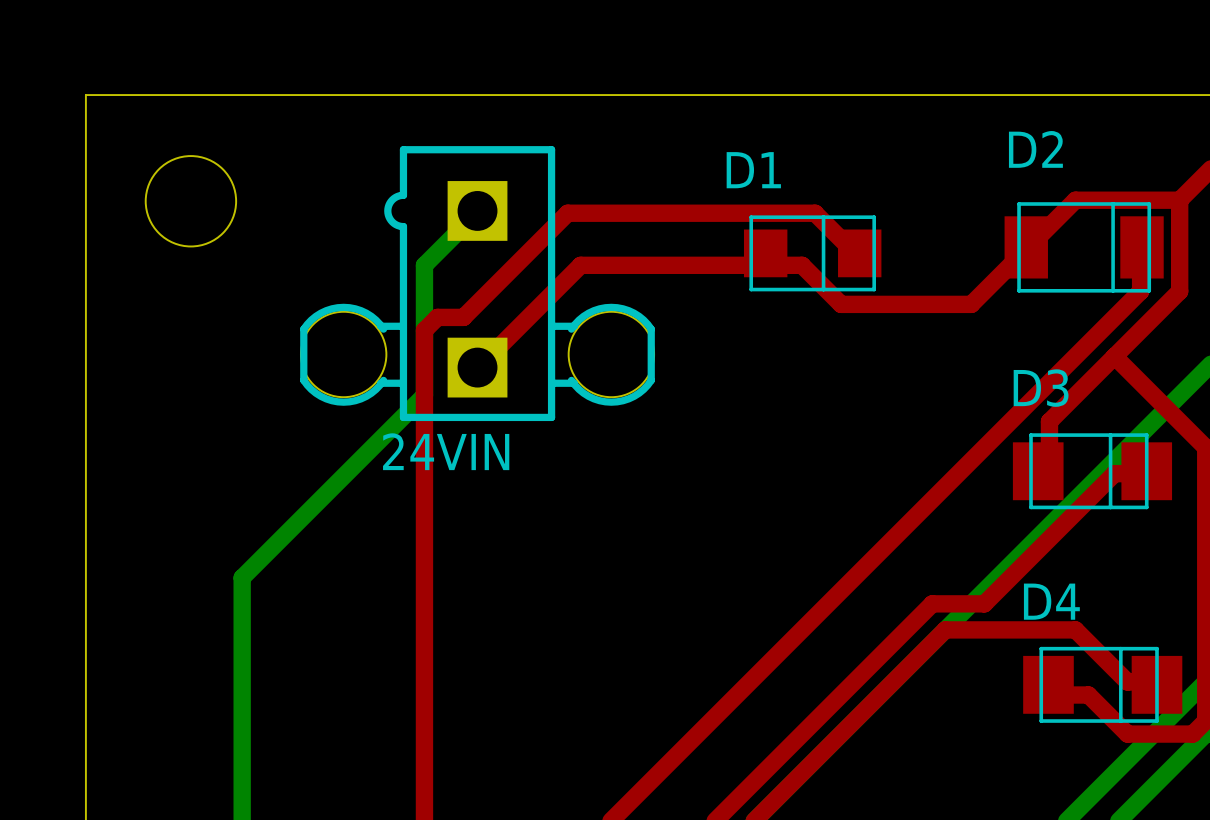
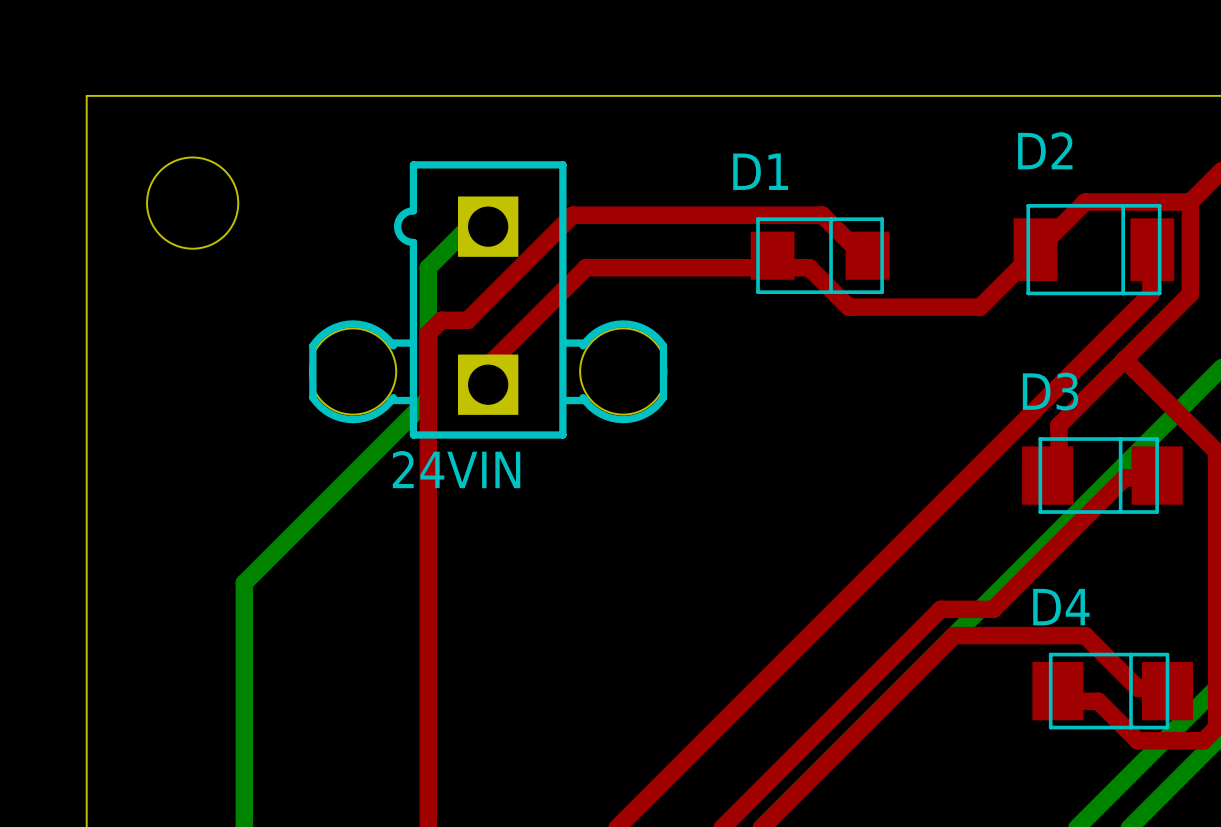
24VIN position: (477, 283) -> (488, 299)

